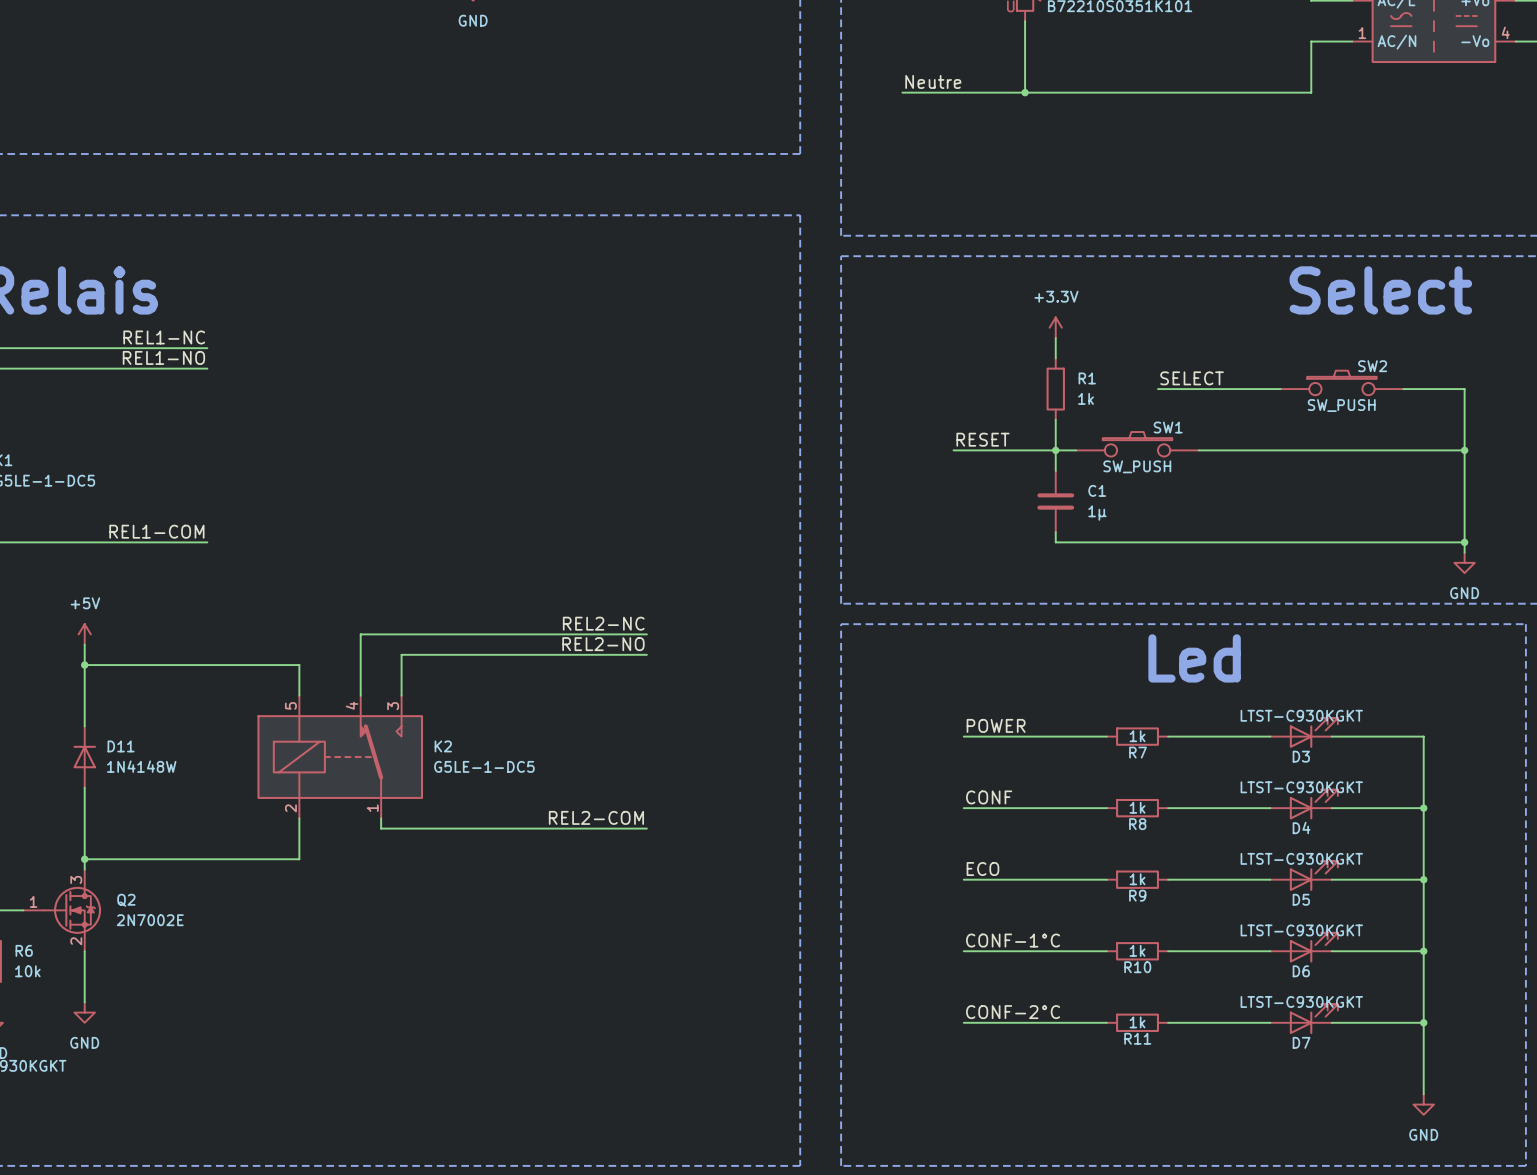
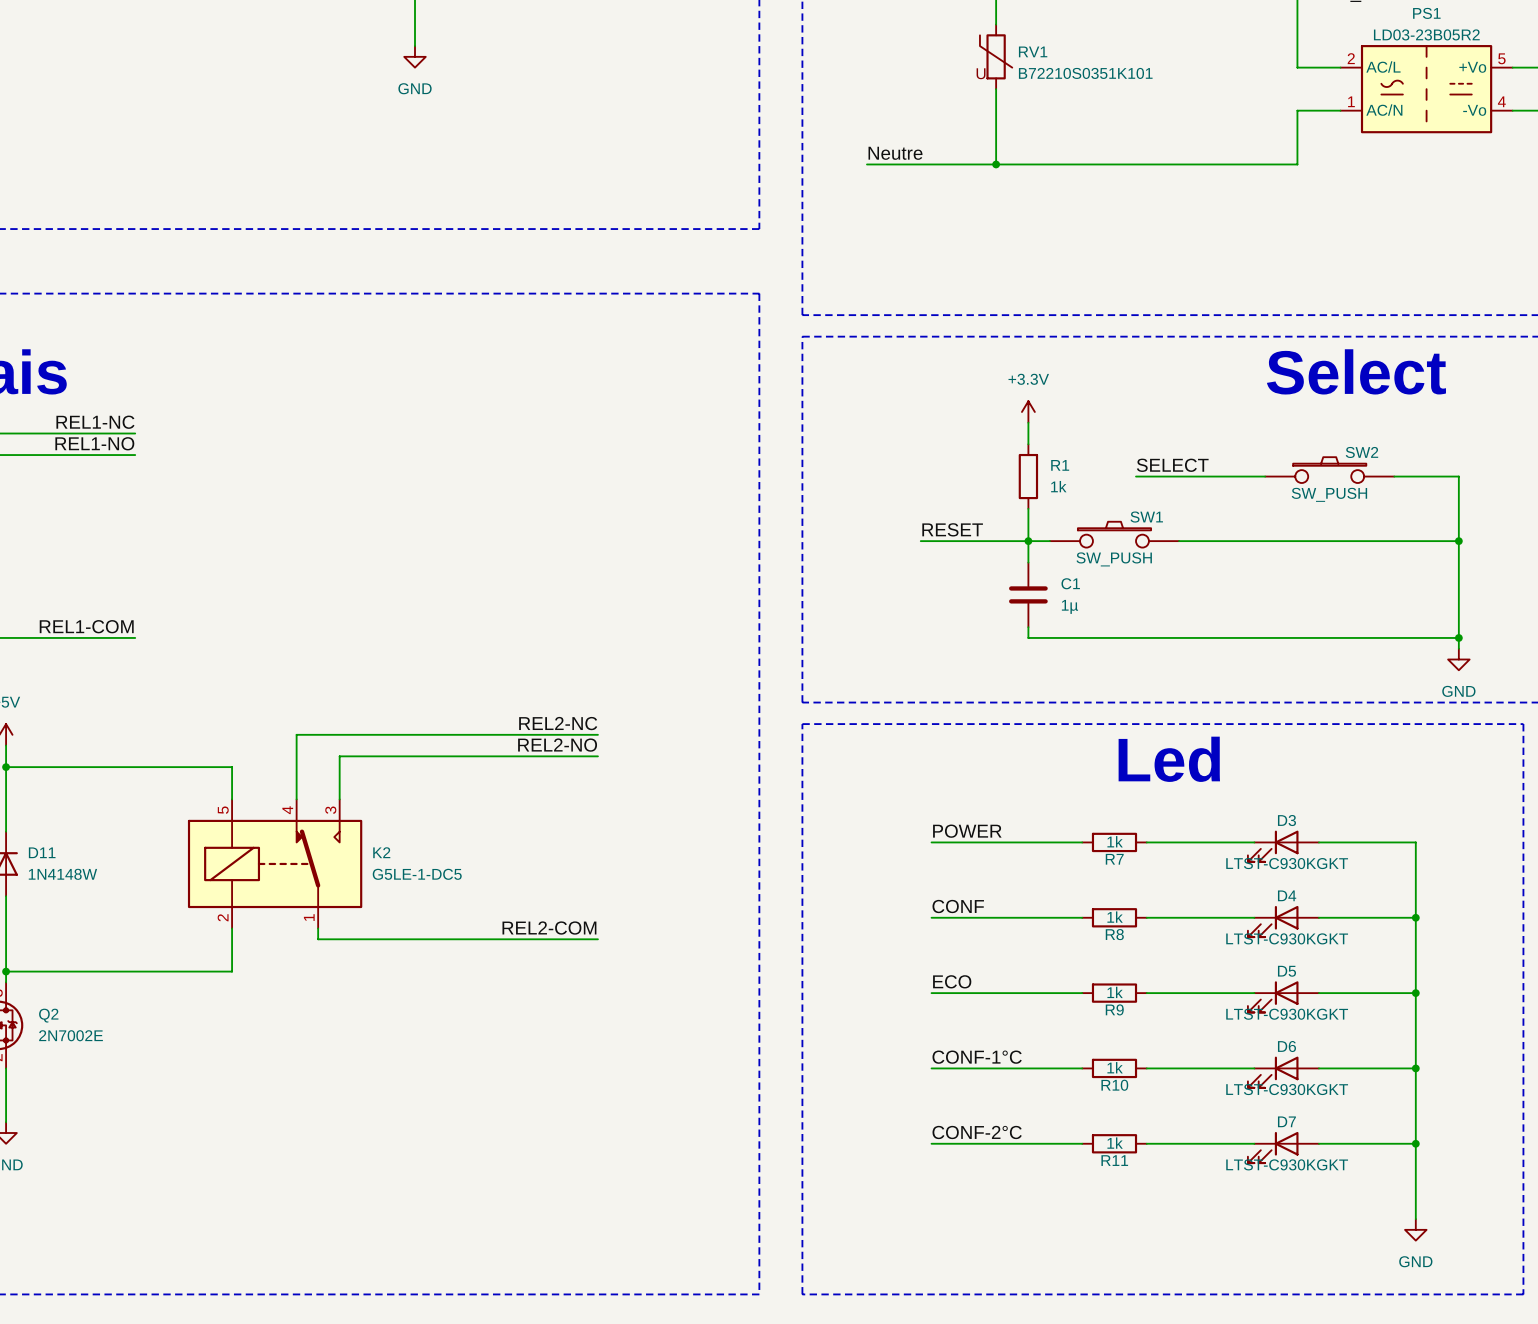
D3 rotation: 0° (1313, 733) -> 180° (1273, 846)
D4 rotation: 0° (1313, 804) -> 180° (1273, 921)
D5 rotation: 0° (1313, 876) -> 180° (1273, 996)
D6 rotation: 0° (1313, 947) -> 180° (1273, 1072)
D7 rotation: 0° (1313, 1019) -> 180° (1273, 1147)

